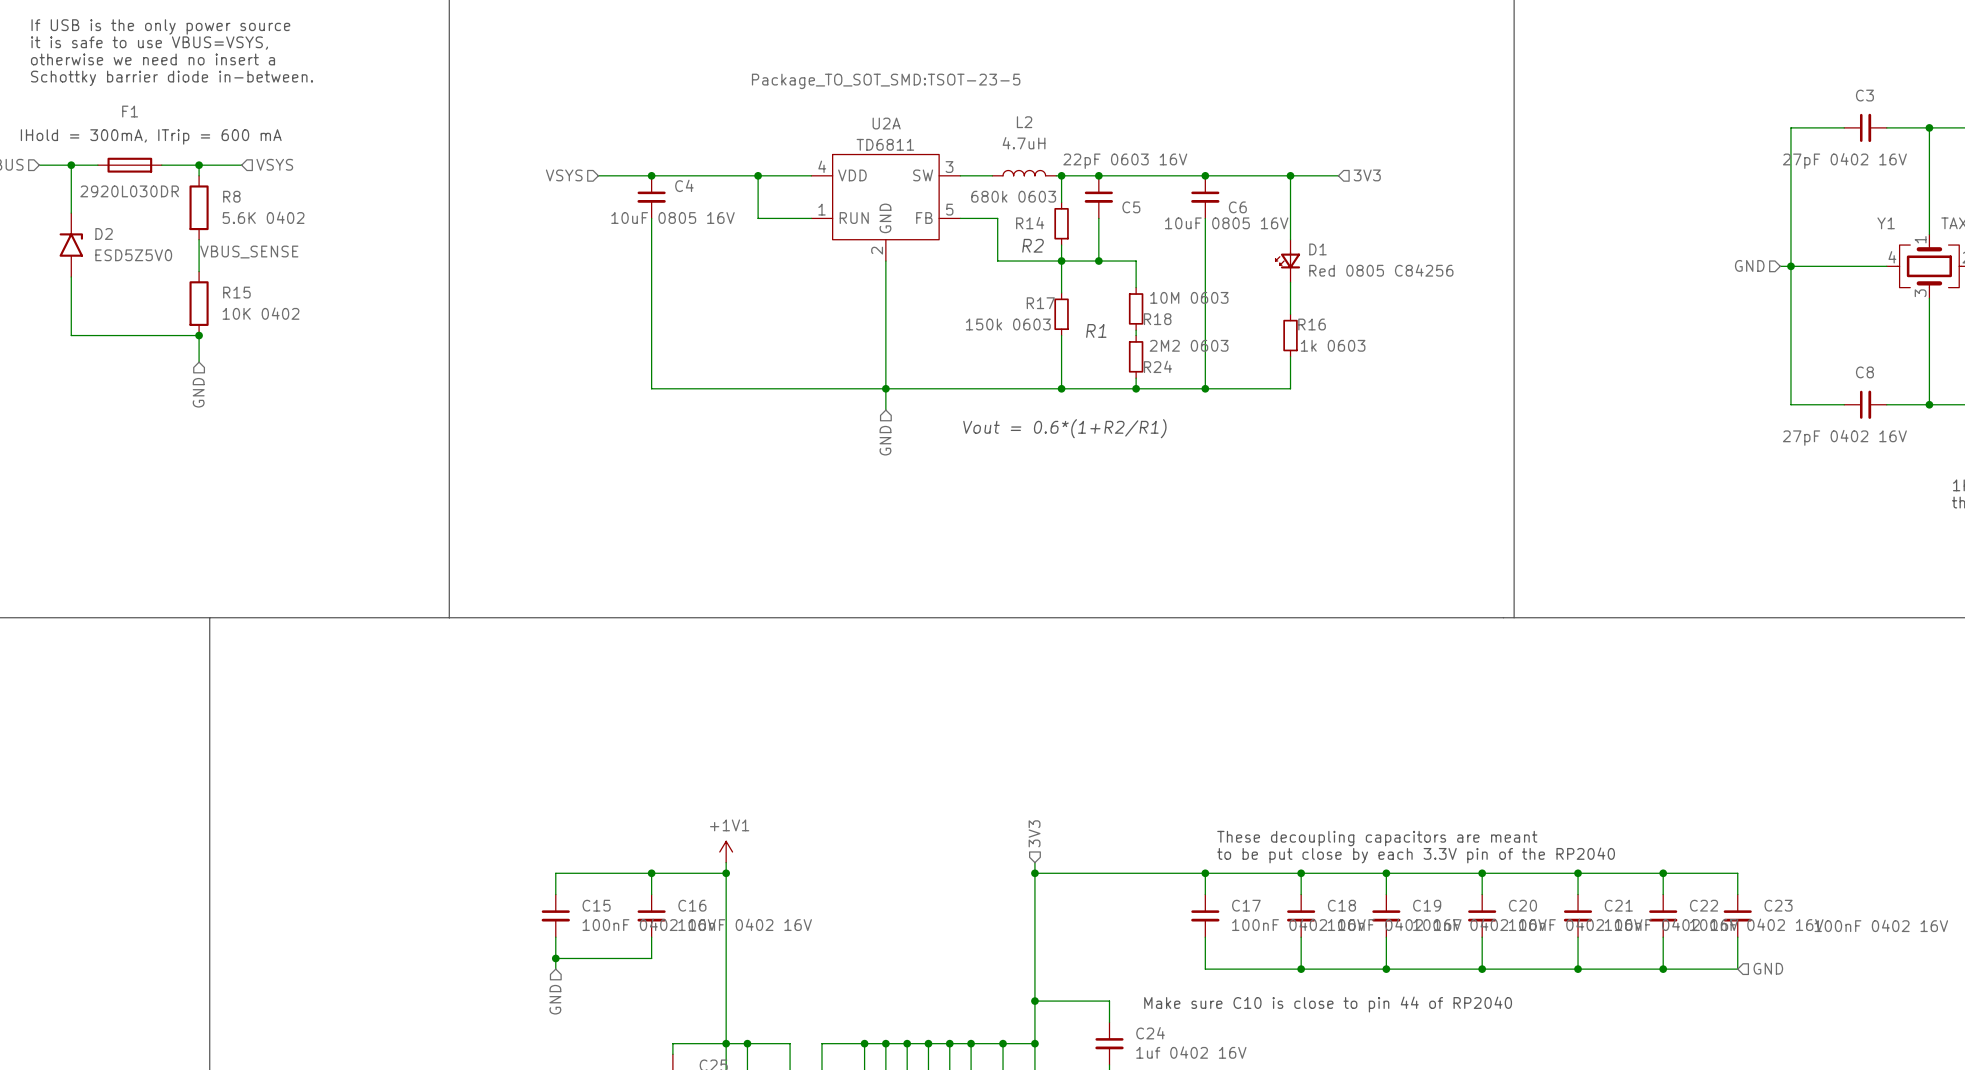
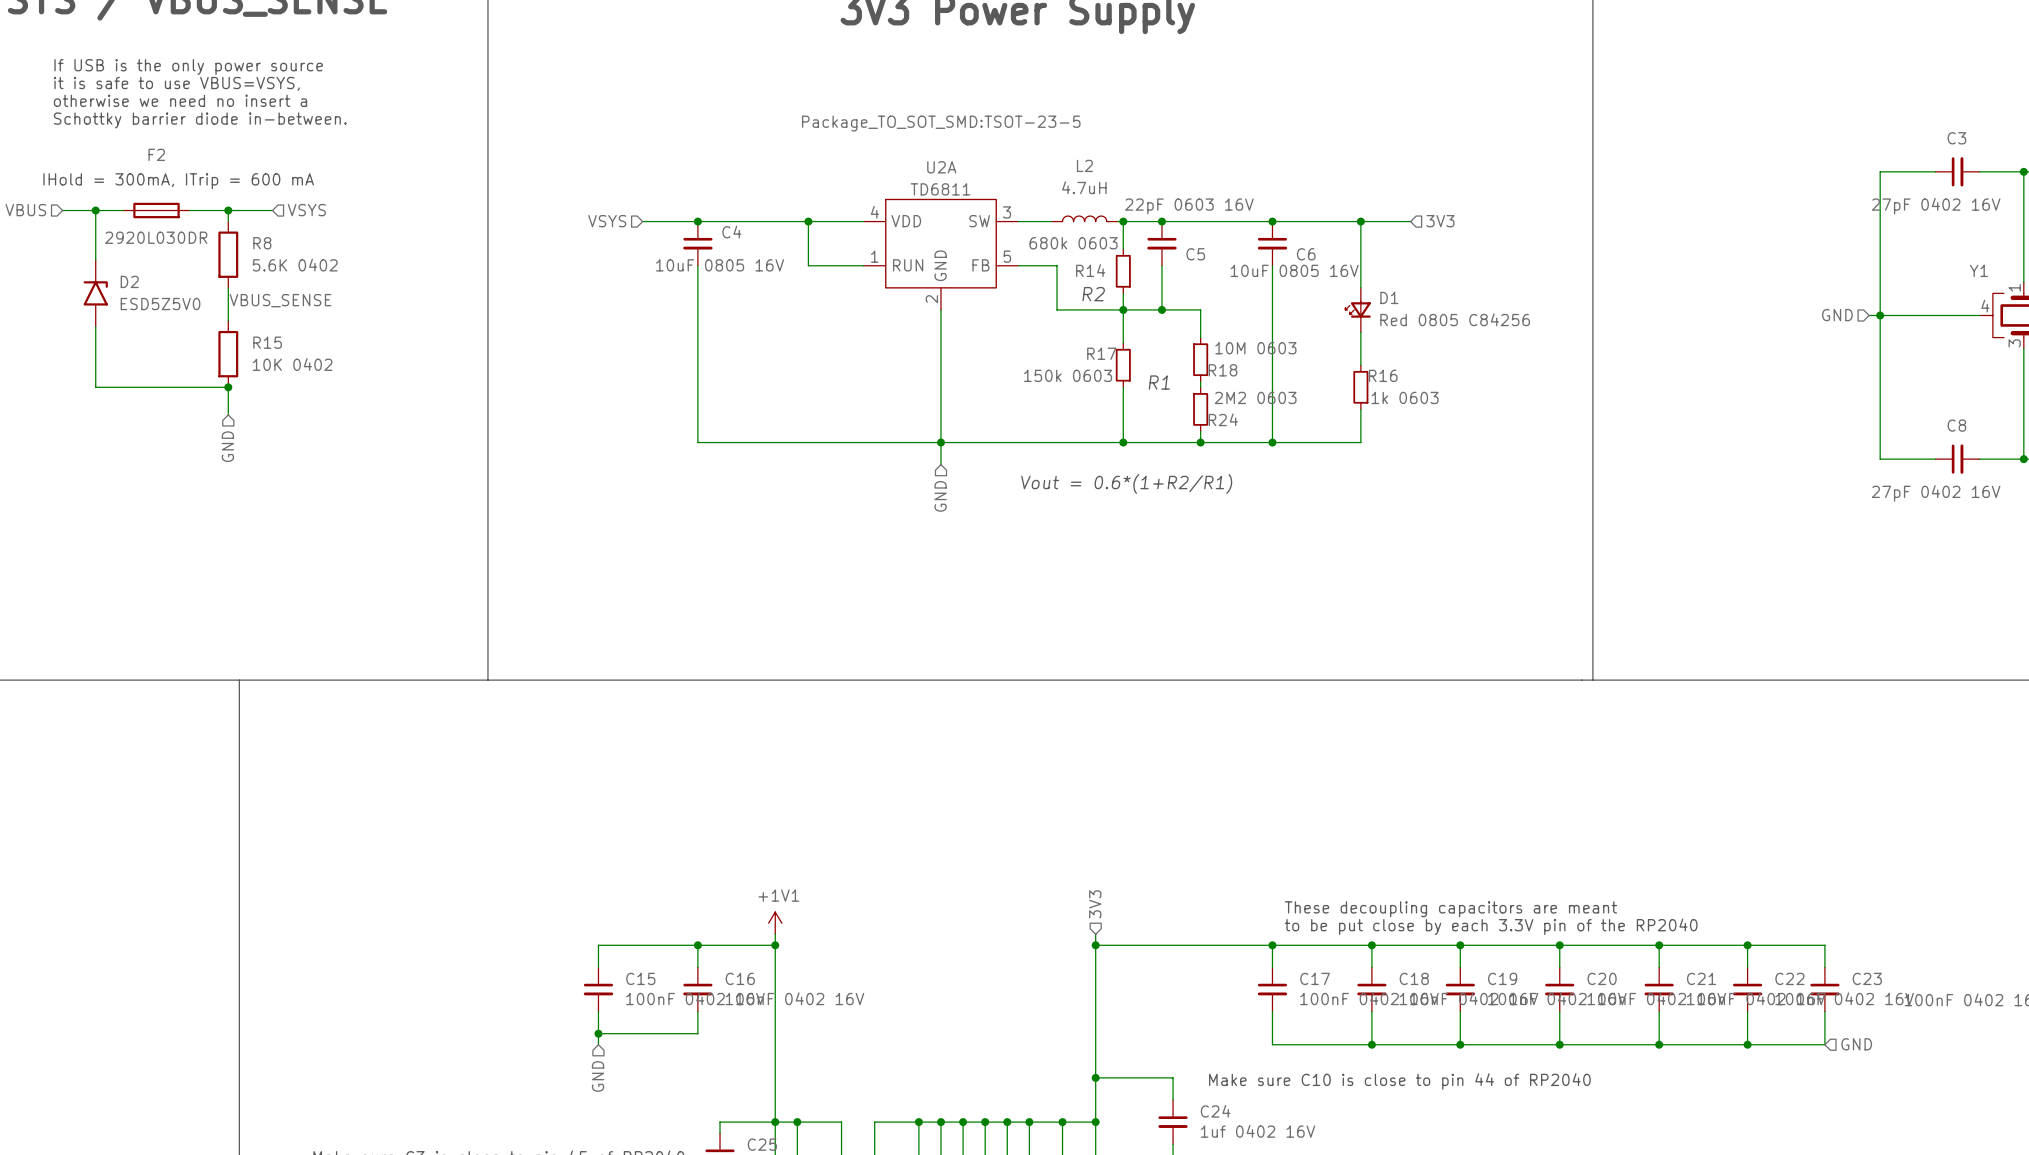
F1 name: F1 (130, 111) -> F2 (156, 154)

